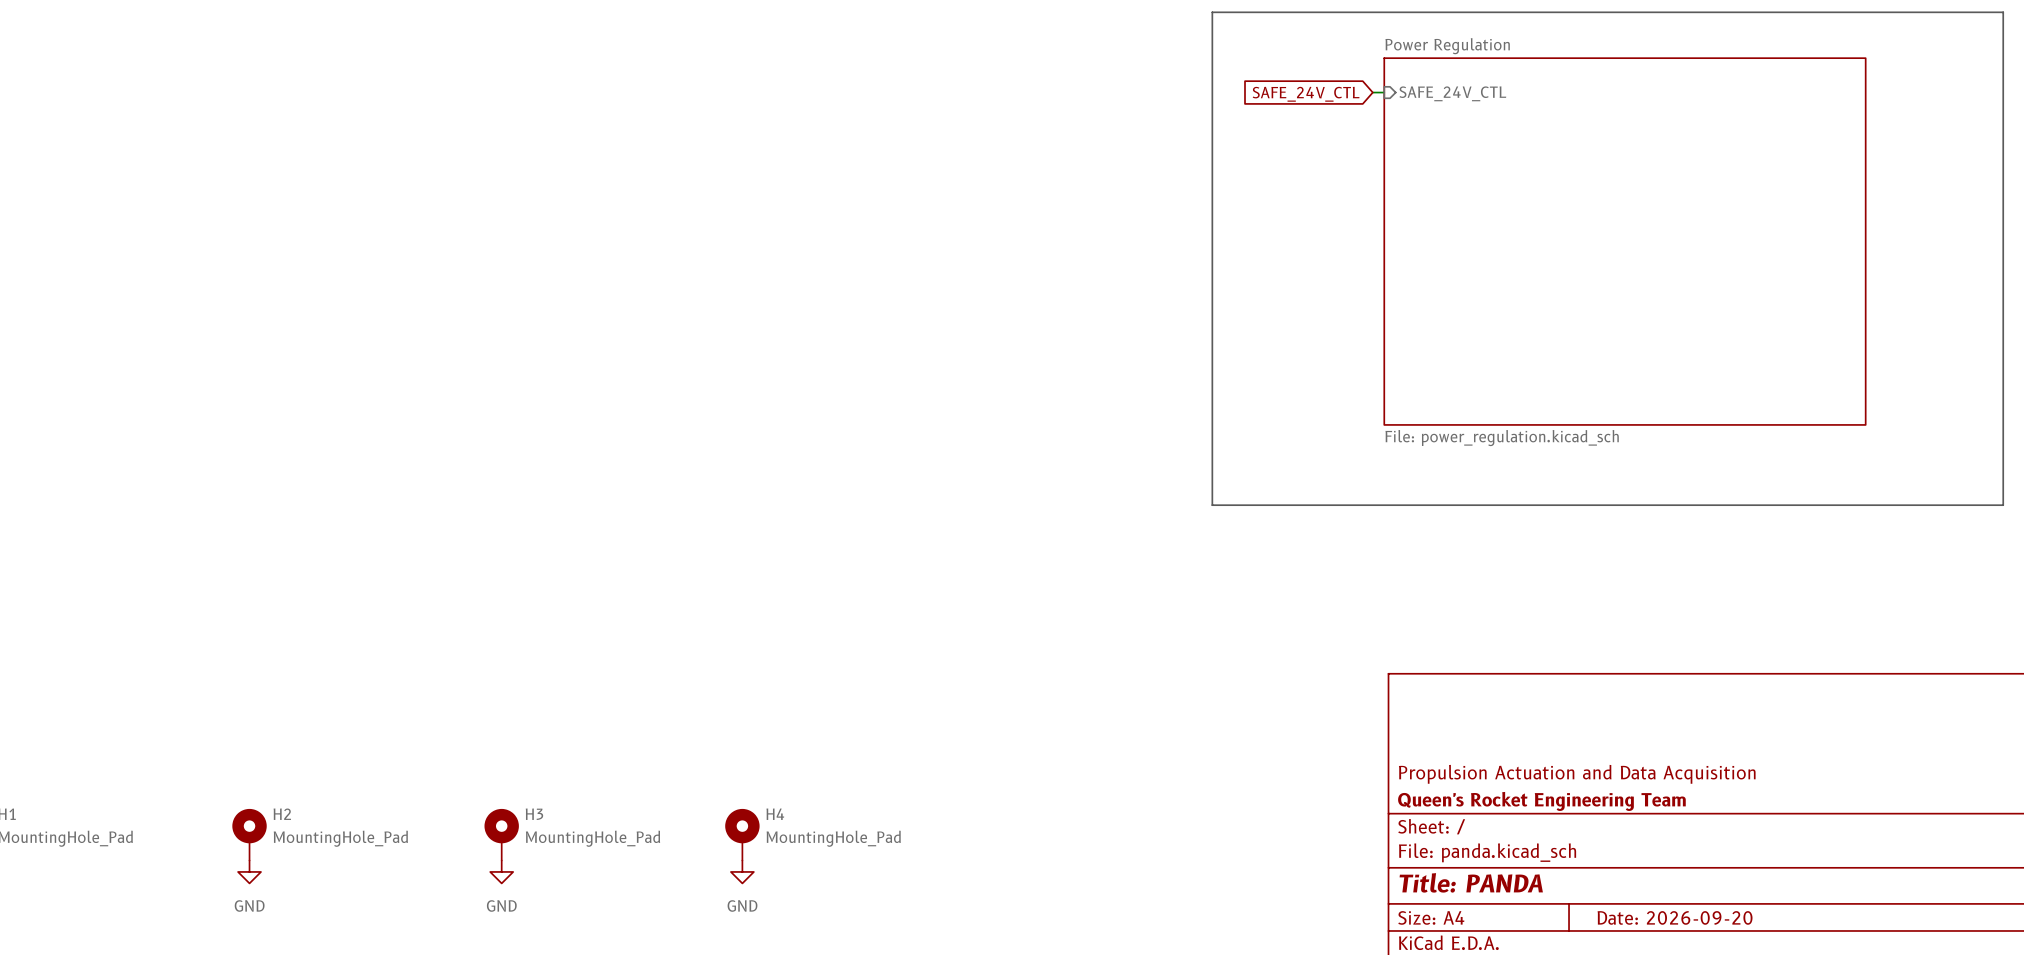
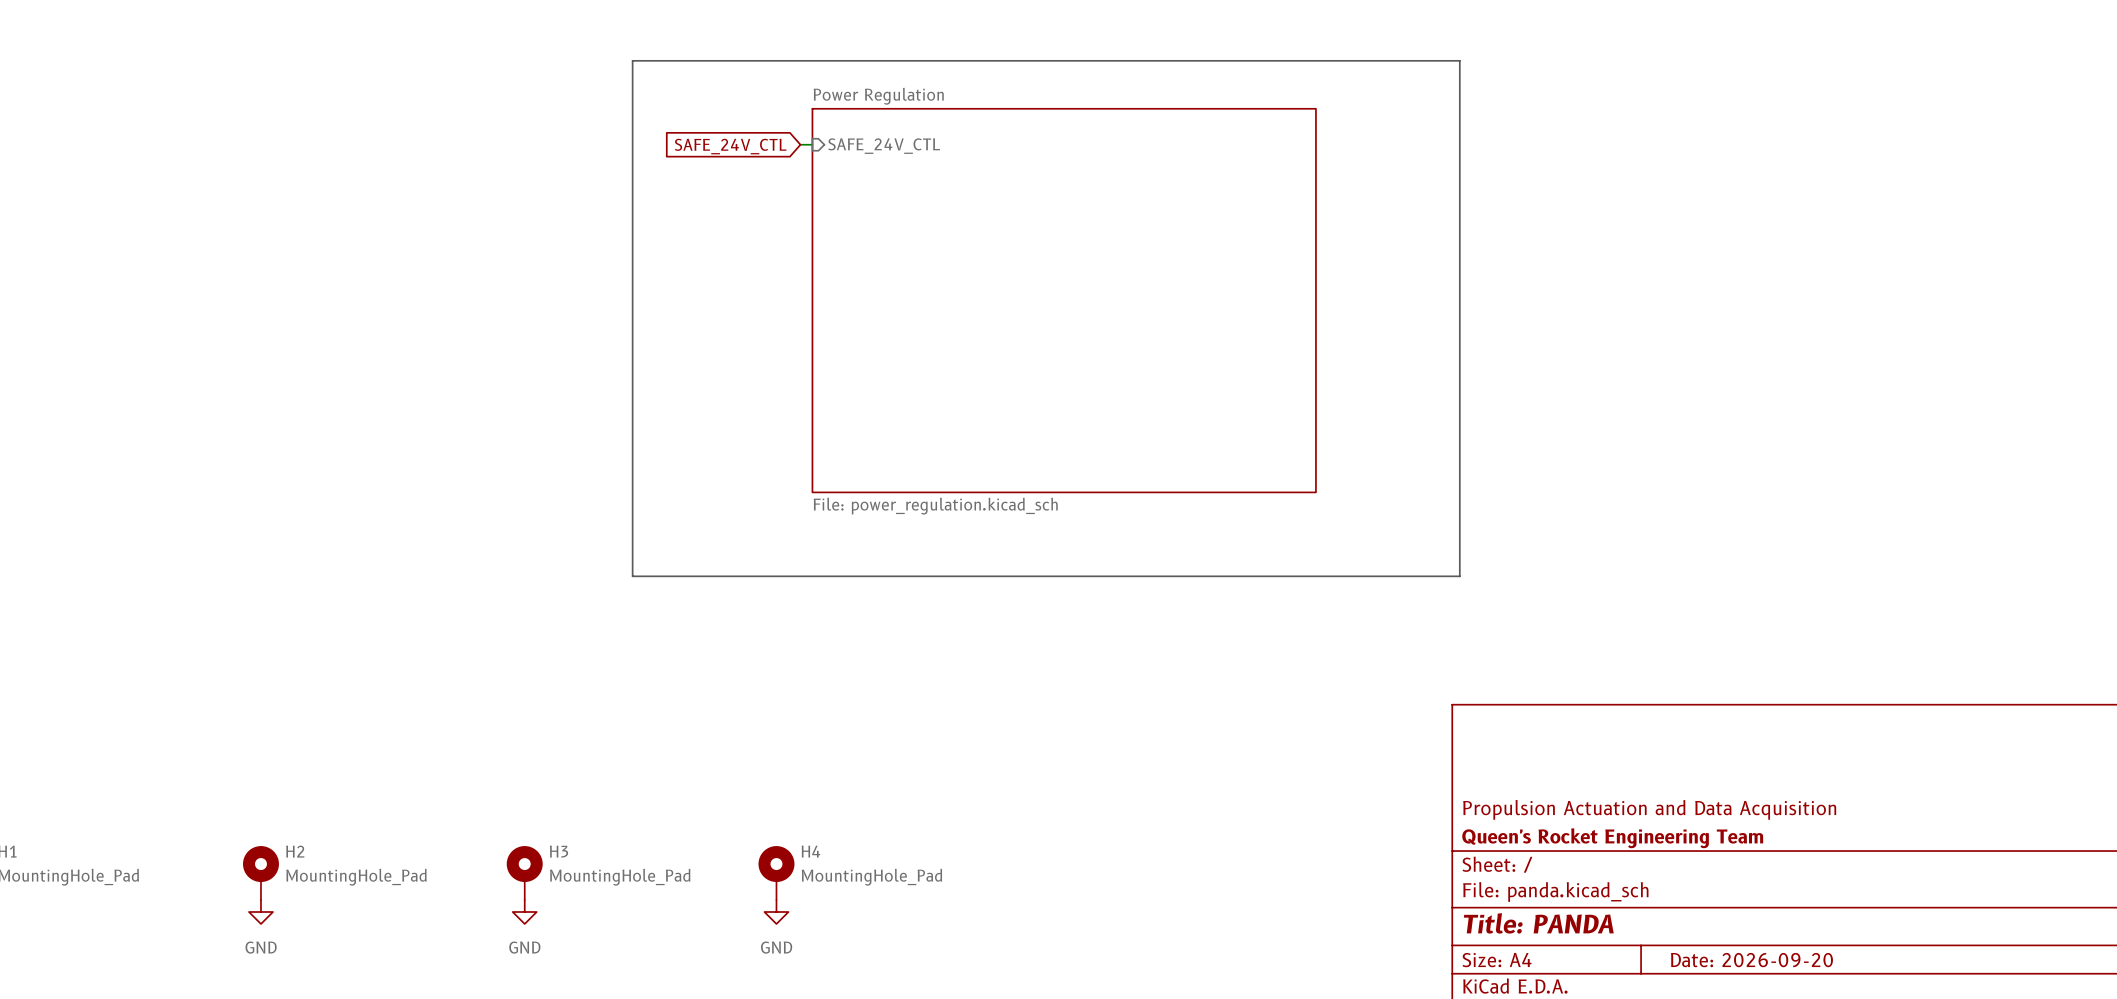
line: (1212, 12) (2003, 12) (2003, 505) (1212, 505) (1212, 12) -> none
line: none -> (632, 60) (1459, 60) (1459, 576) (632, 576) (632, 60)
wire: (1372, 92) (1384, 92) -> none
sheet pin: SAFE_24V_CTL (1452, 93) -> none
global label: SAFE_24V_CTL (1306, 94) -> none
wire: none -> (800, 144) (812, 144)
sheet pin: none -> SAFE_24V_CTL (884, 146)
global label: none -> SAFE_24V_CTL (730, 146)
sheet Power Regulation: File: power_regulation.kicad_sch (1624, 241) -> none
sheet Power Regulation: none -> File: power_regulation.kicad_sch (1064, 300)

